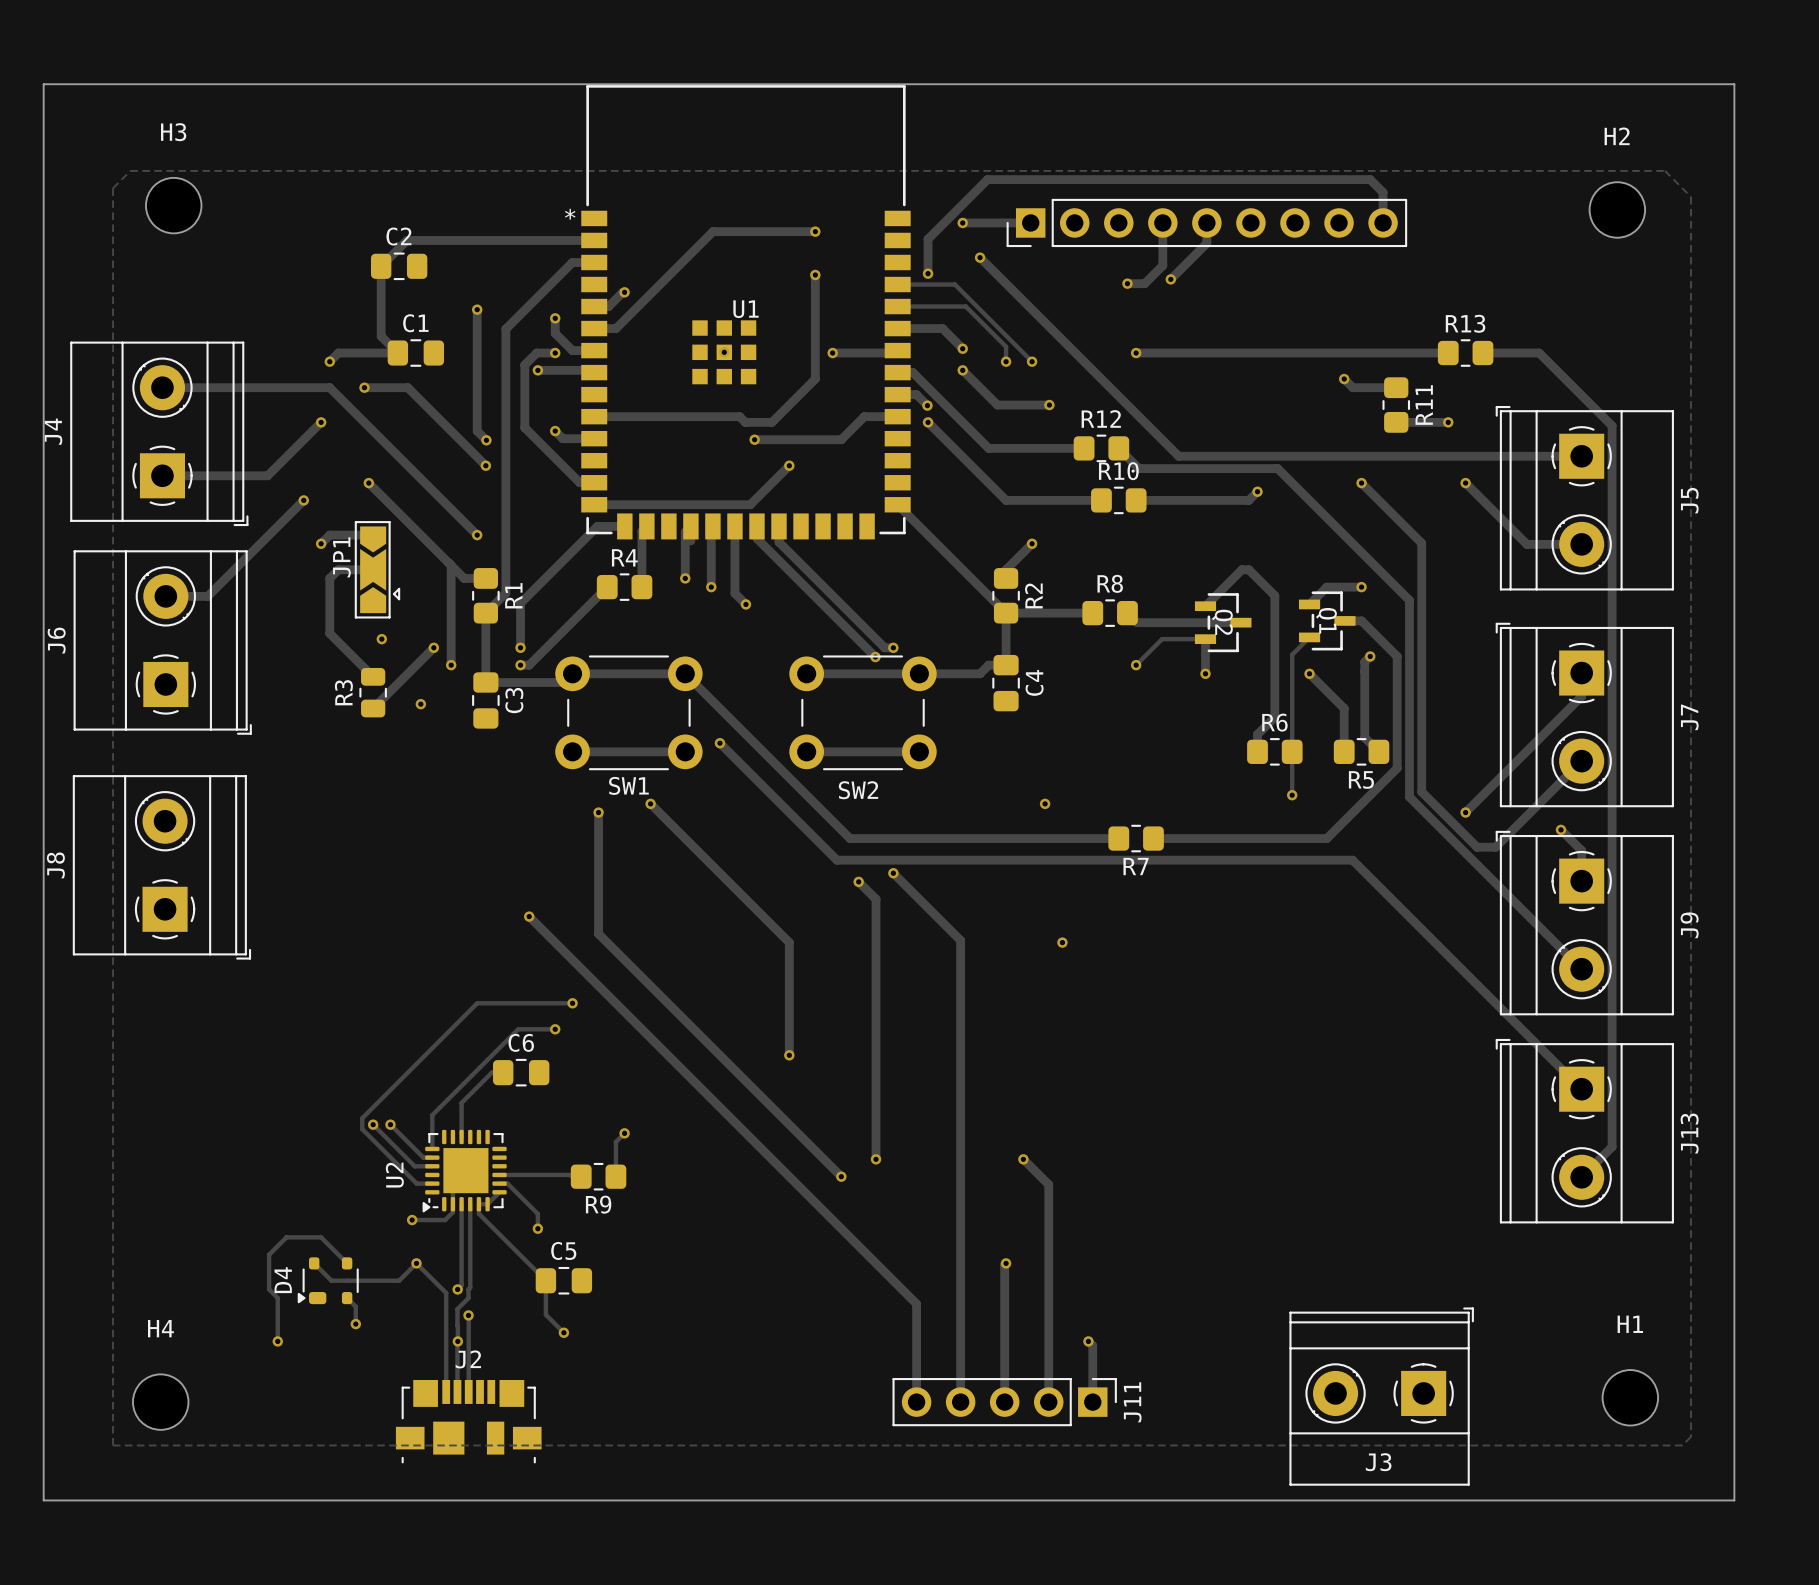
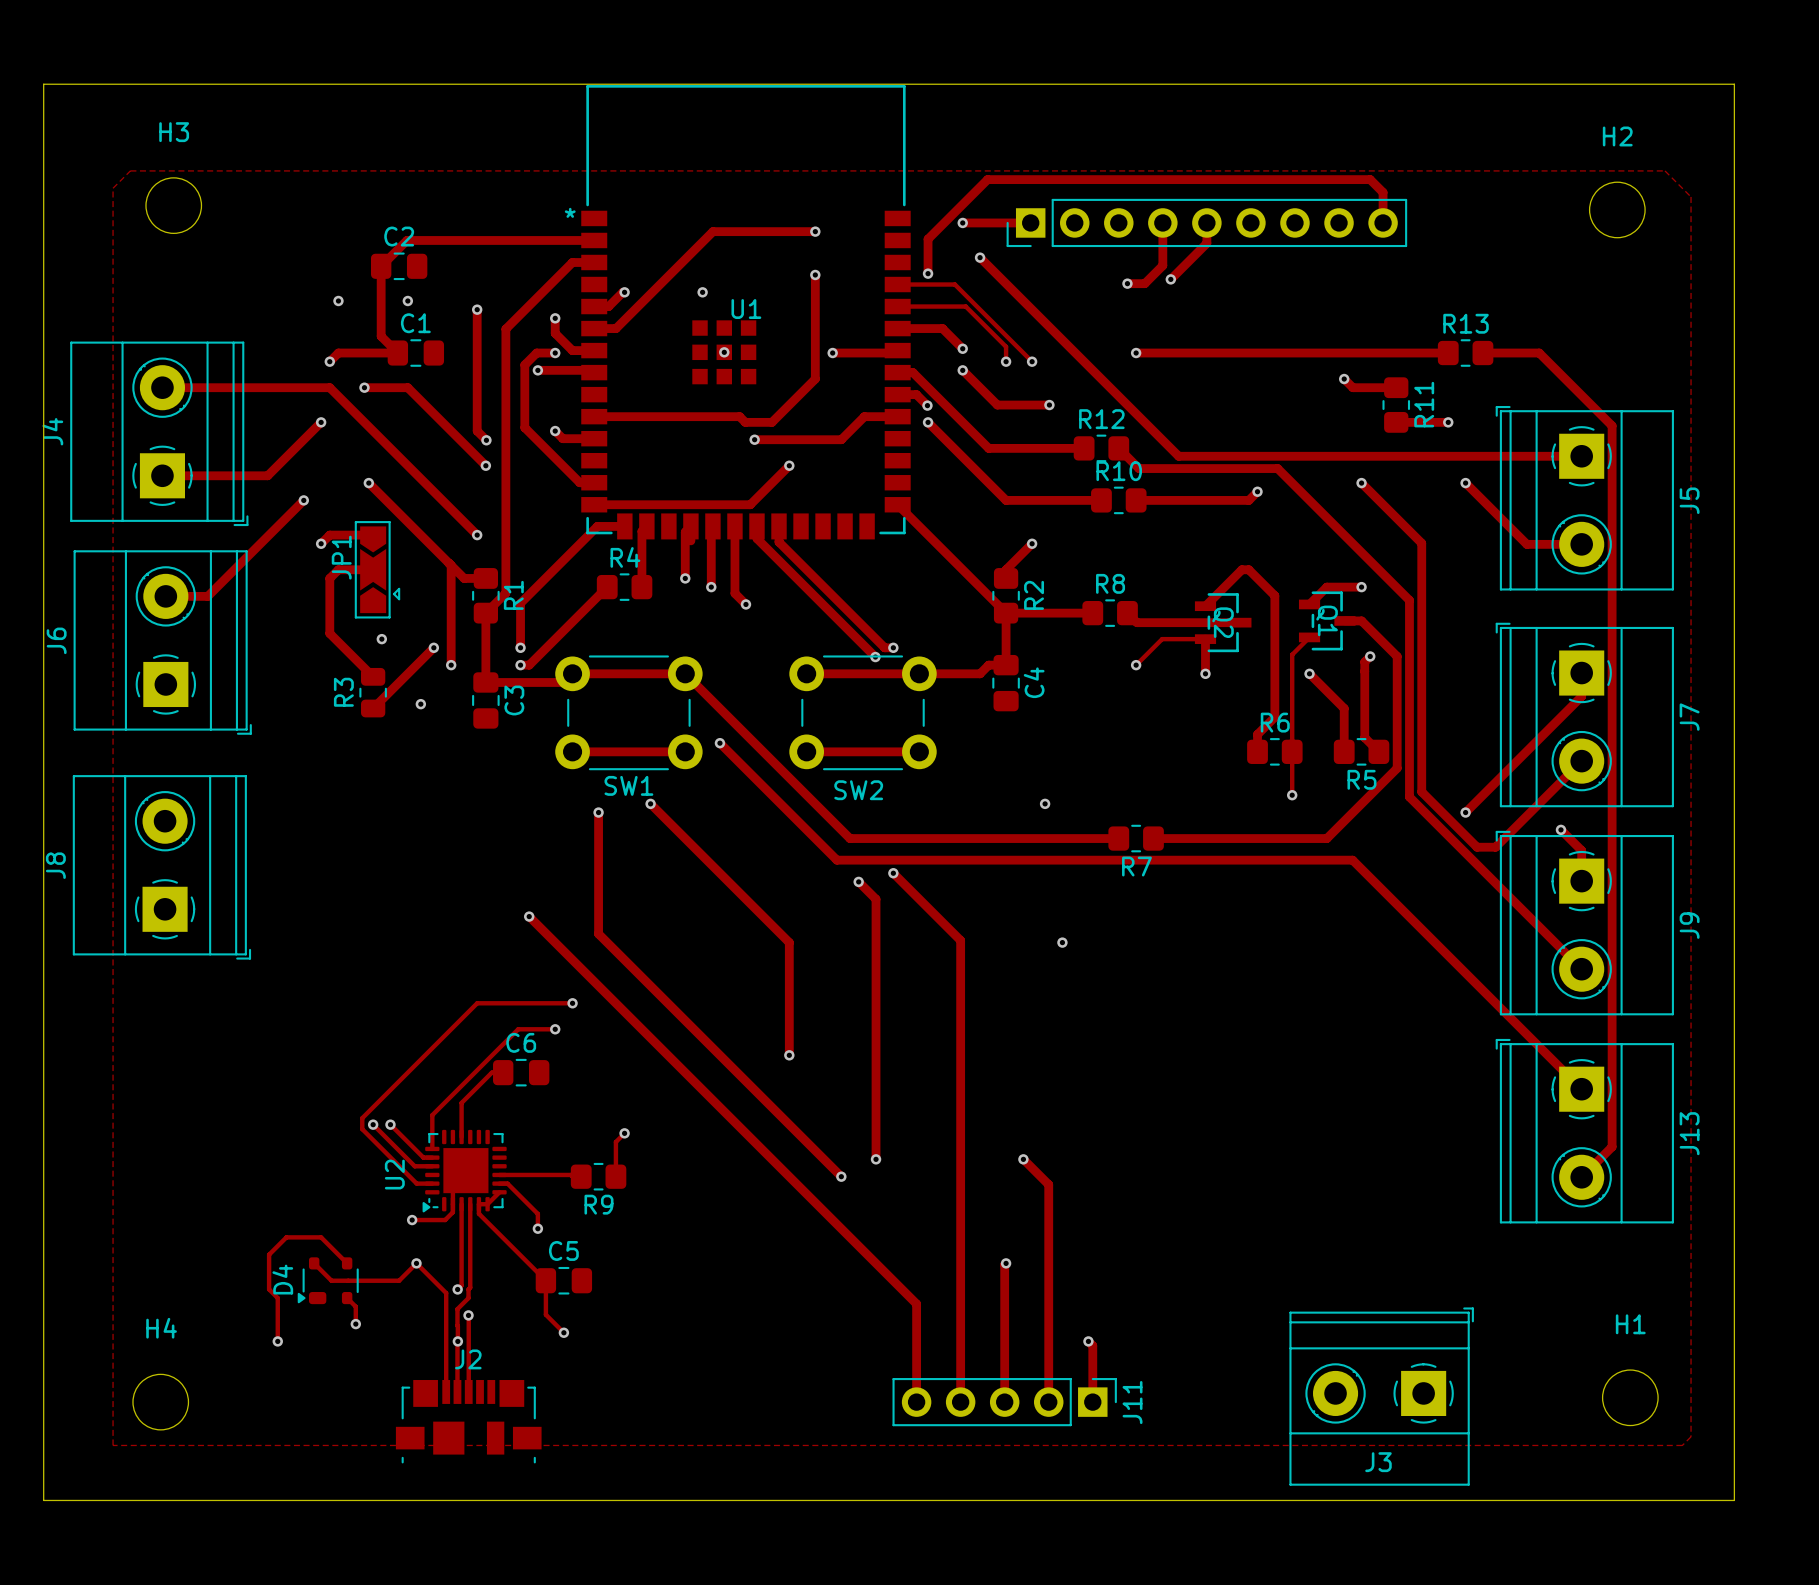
via: none -> (702, 292)
via: none -> (338, 300)
via: none -> (407, 300)

